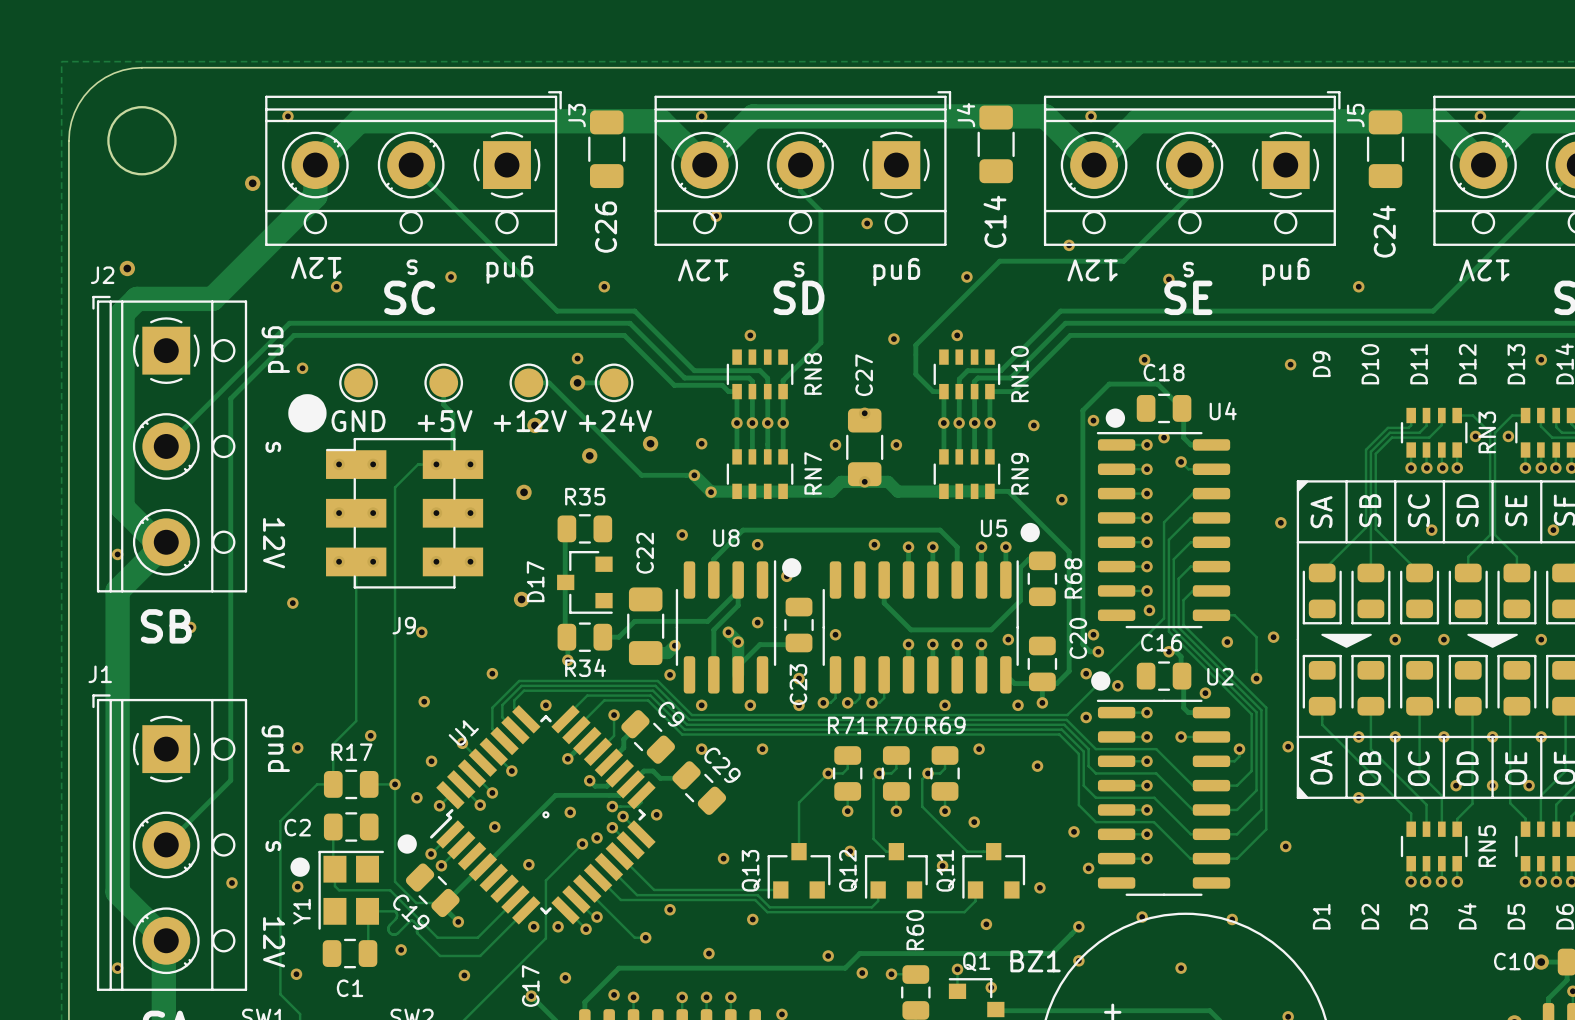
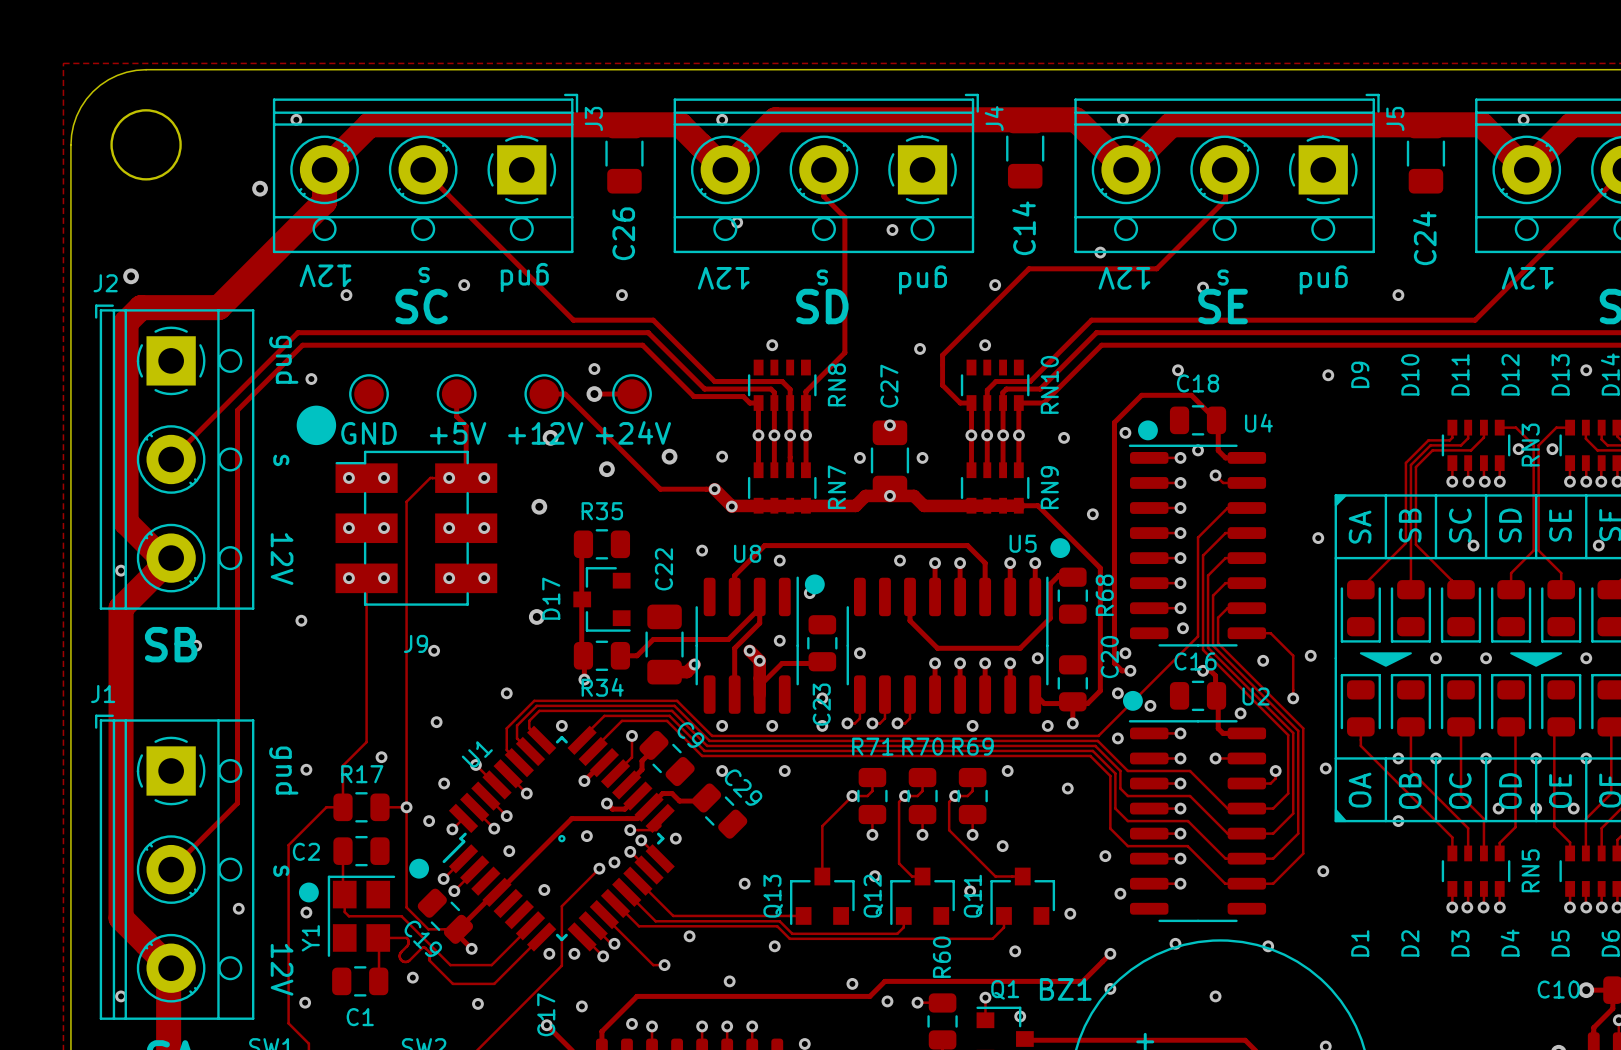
via: (670, 674) -> none

